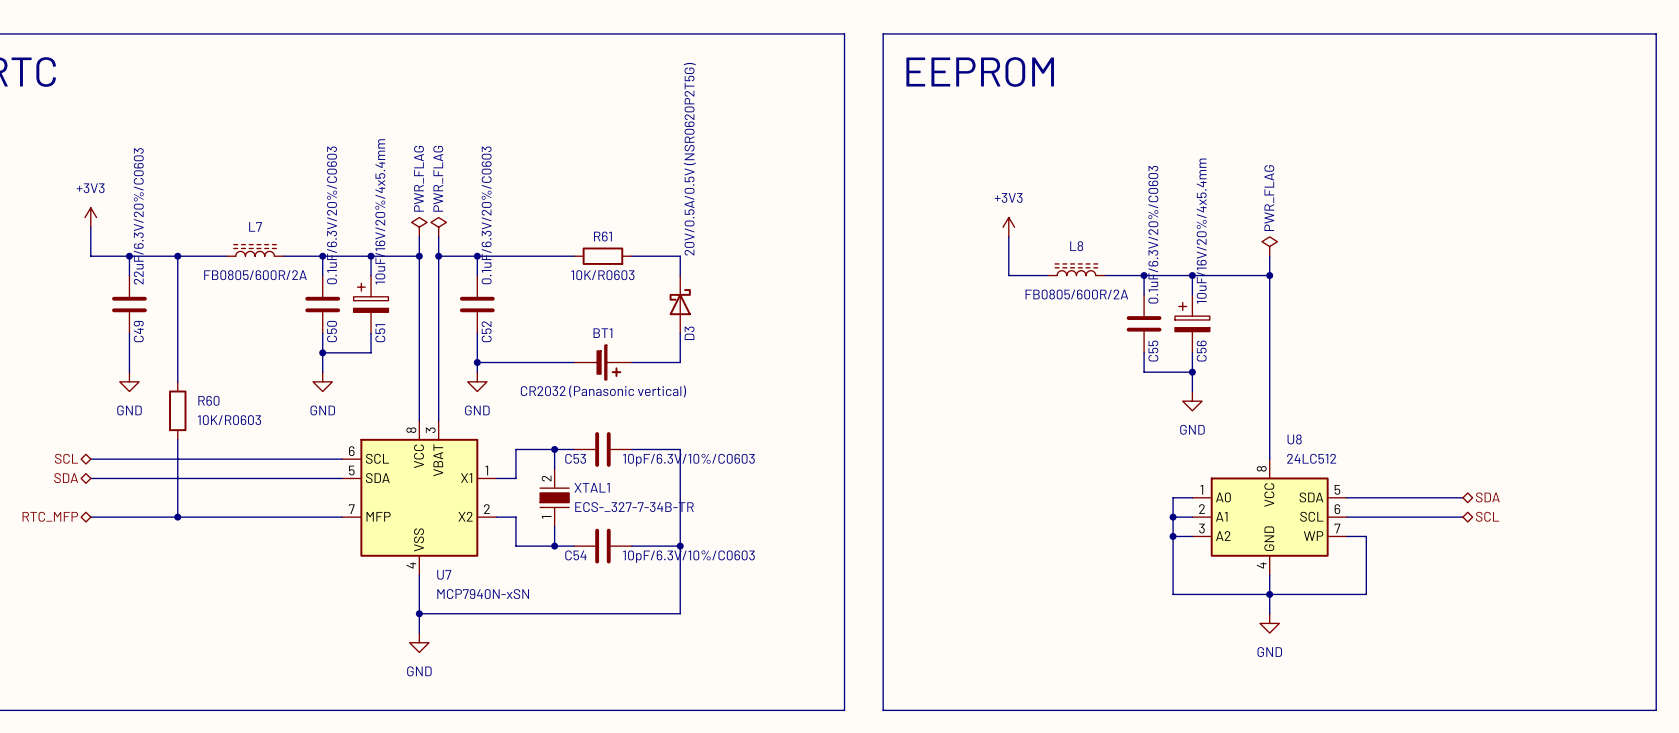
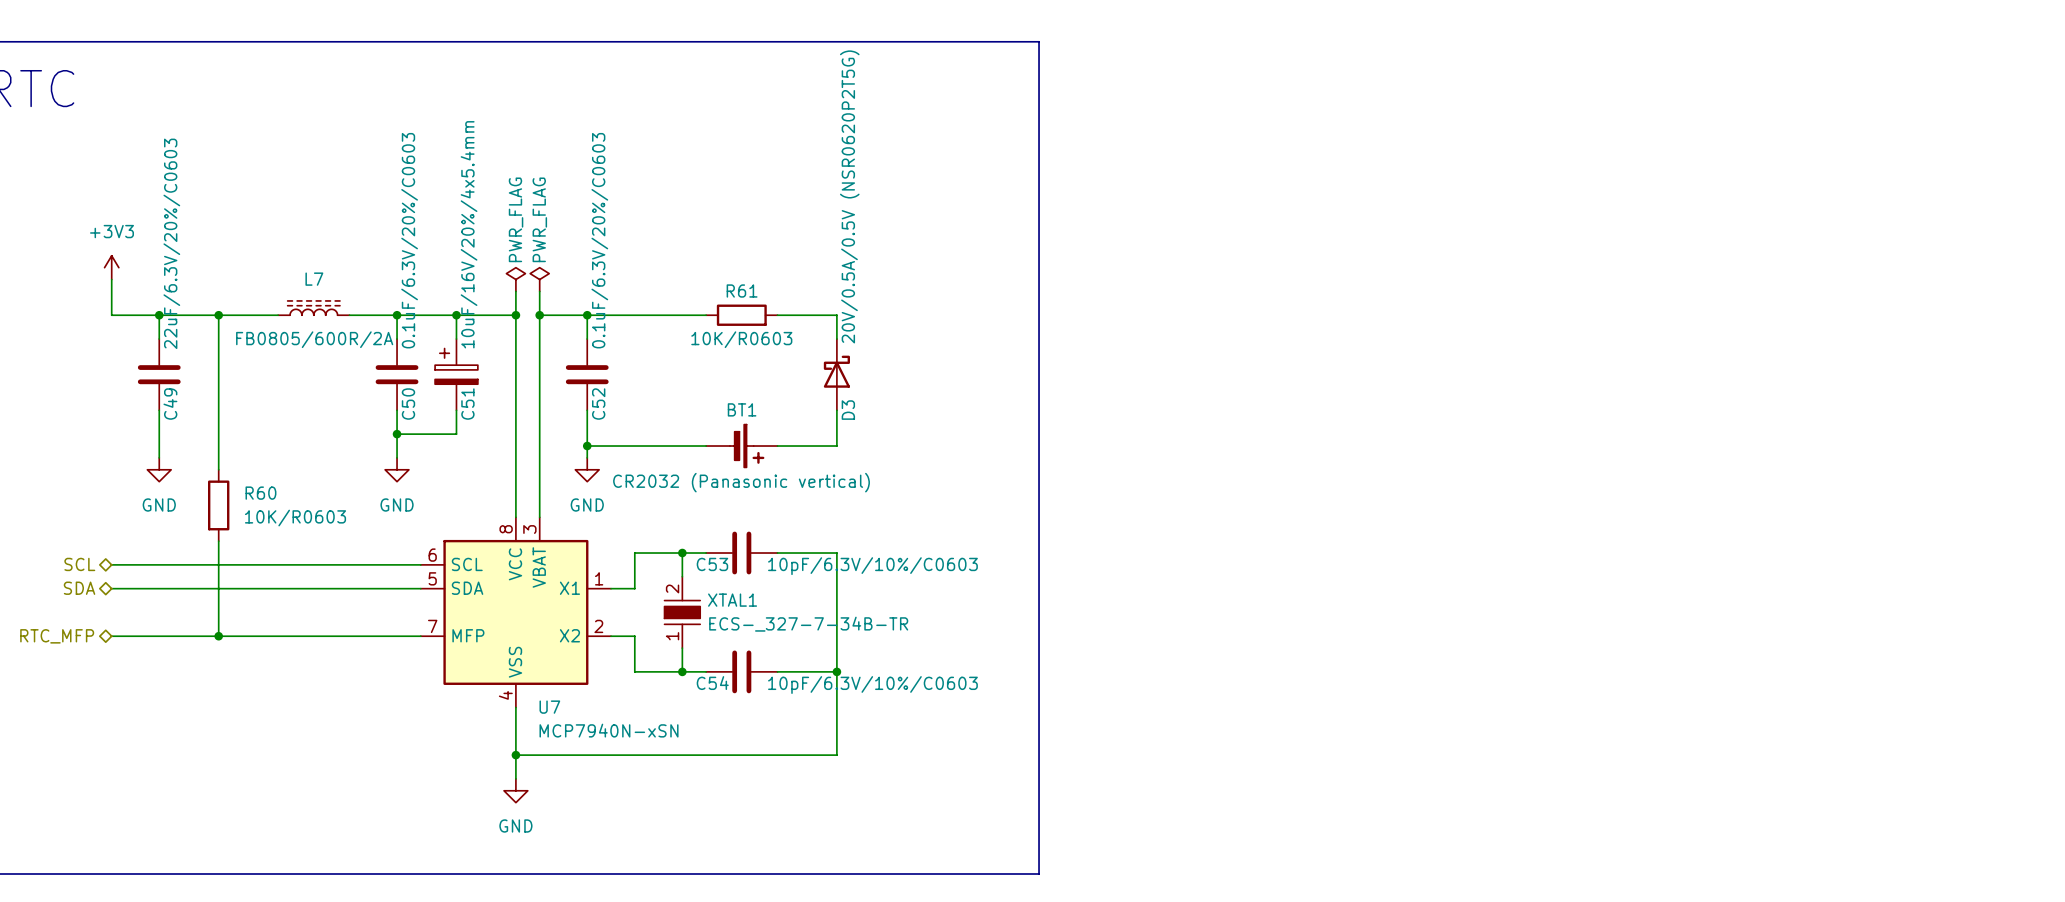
line: (883, 33) (1656, 33) (1656, 710) (883, 710) (883, 33) -> none
text: EEPROM (980, 72) -> none
power symbol: +3V3 (1008, 227) -> none
wire: (1008, 236) (1008, 275) (1047, 275) -> none
power symbol: PWR_FLAG (1269, 246) -> none
wire: (1269, 256) (1269, 459) -> none
L8: FB0805/600R/2A (1076, 269) -> none
wire: (1105, 275) (1269, 275) -> none
wire: (1144, 275) (1144, 294) -> none
junction: (1144, 275) -> none
wire: (1192, 275) (1192, 294) -> none
junction: (1192, 275) -> none
junction: (1269, 275) -> none
C55: 0.1uF/6.3V/20%/C0603 (1144, 323) -> none
C56: 10uF/16V/20%/4x5.4mm (1192, 323) -> none
wire: (1144, 352) (1144, 372) (1192, 372) -> none
wire: (1192, 352) (1192, 391) -> none
junction: (1192, 372) -> none
power symbol: GND (1192, 401) -> none
wire: (1192, 497) (1173, 497) (1173, 594) (1366, 594) (1366, 536) (1346, 536) -> none
wire: (1346, 497) (1462, 497) -> none
hierarchical label: SDA (1487, 497) -> none
hierarchical label: SCL (1487, 516) -> none
wire: (1173, 517) (1192, 517) -> none
junction: (1173, 517) -> none
U8: 24LC512 (1269, 517) -> none
wire: (1346, 517) (1462, 517) -> none
wire: (1173, 536) (1192, 536) -> none
junction: (1173, 536) -> none
wire: (1269, 575) (1269, 613) -> none
junction: (1269, 594) -> none
power symbol: GND (1269, 623) -> none

